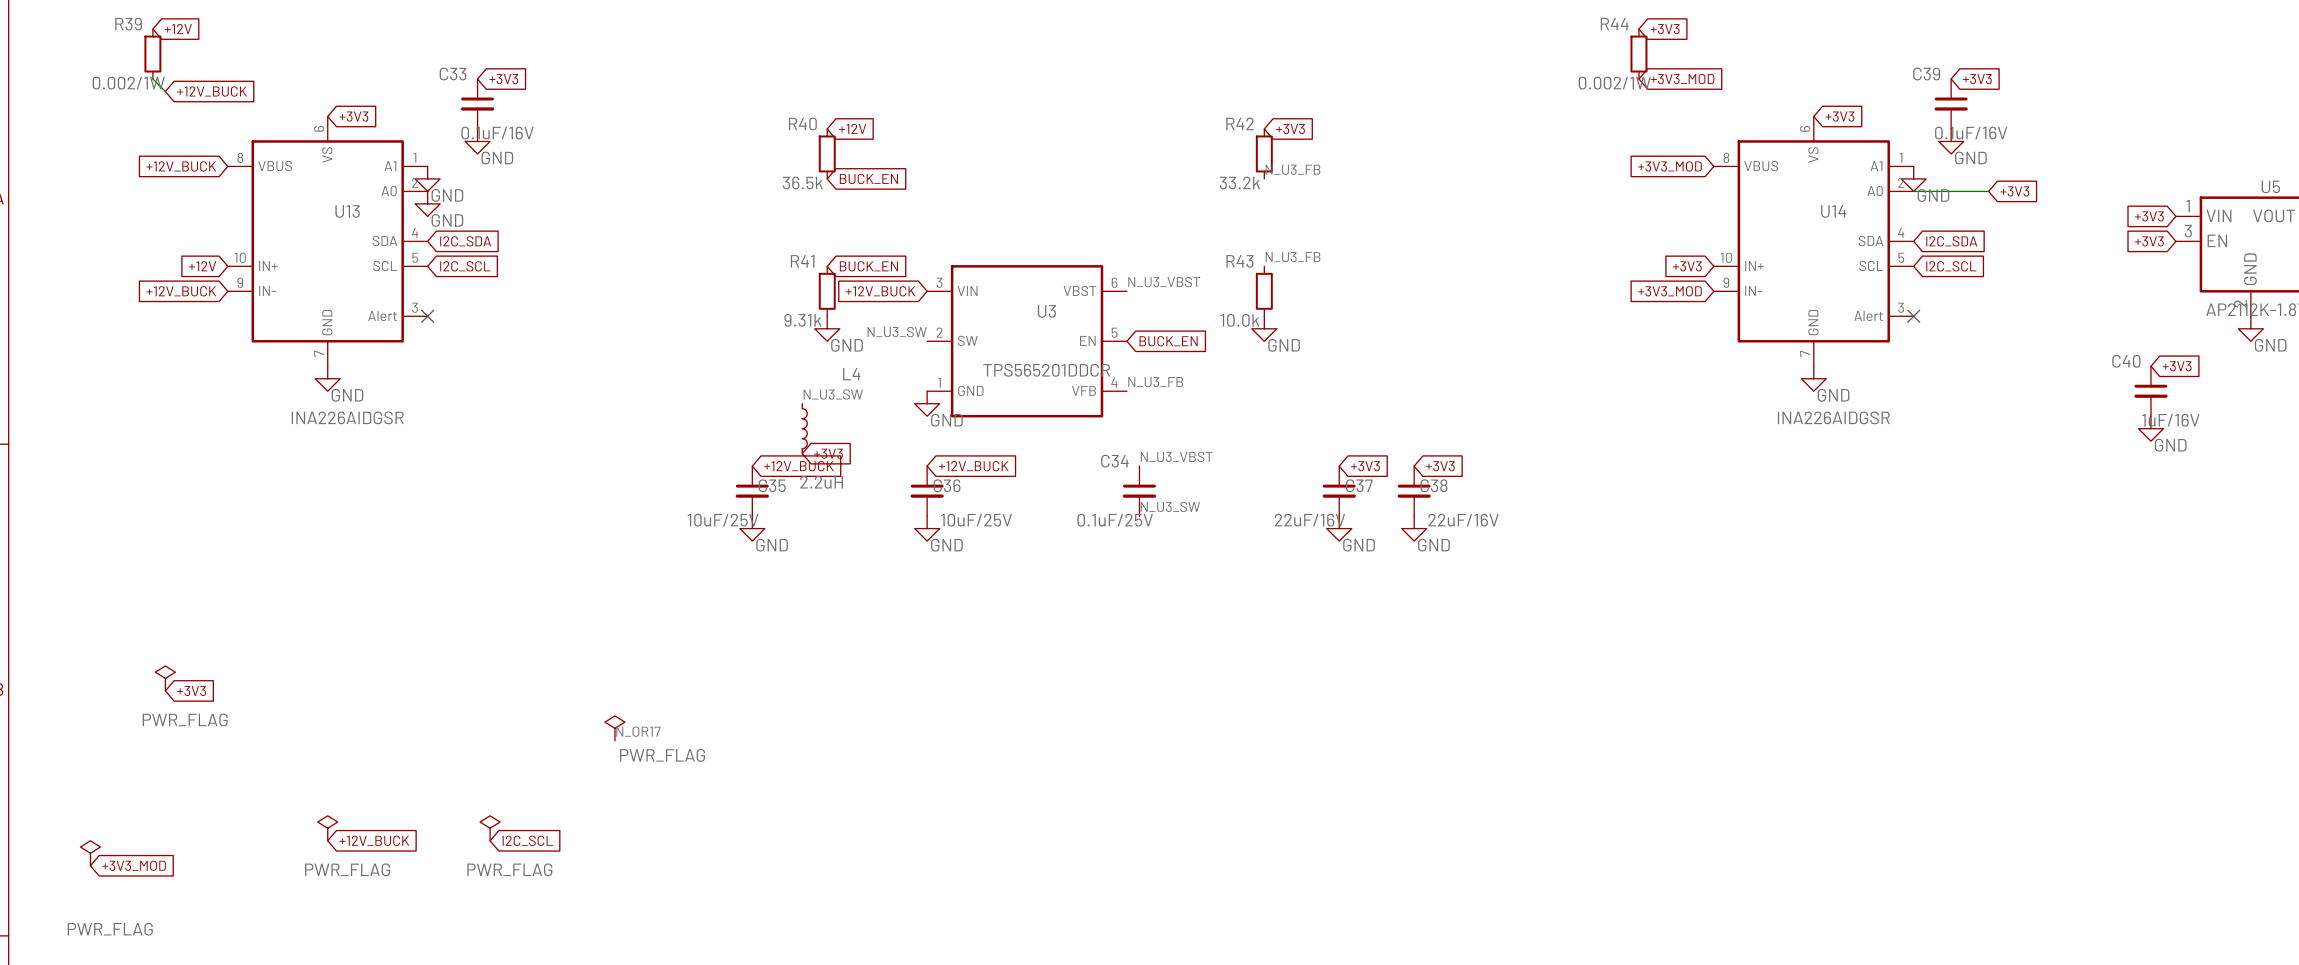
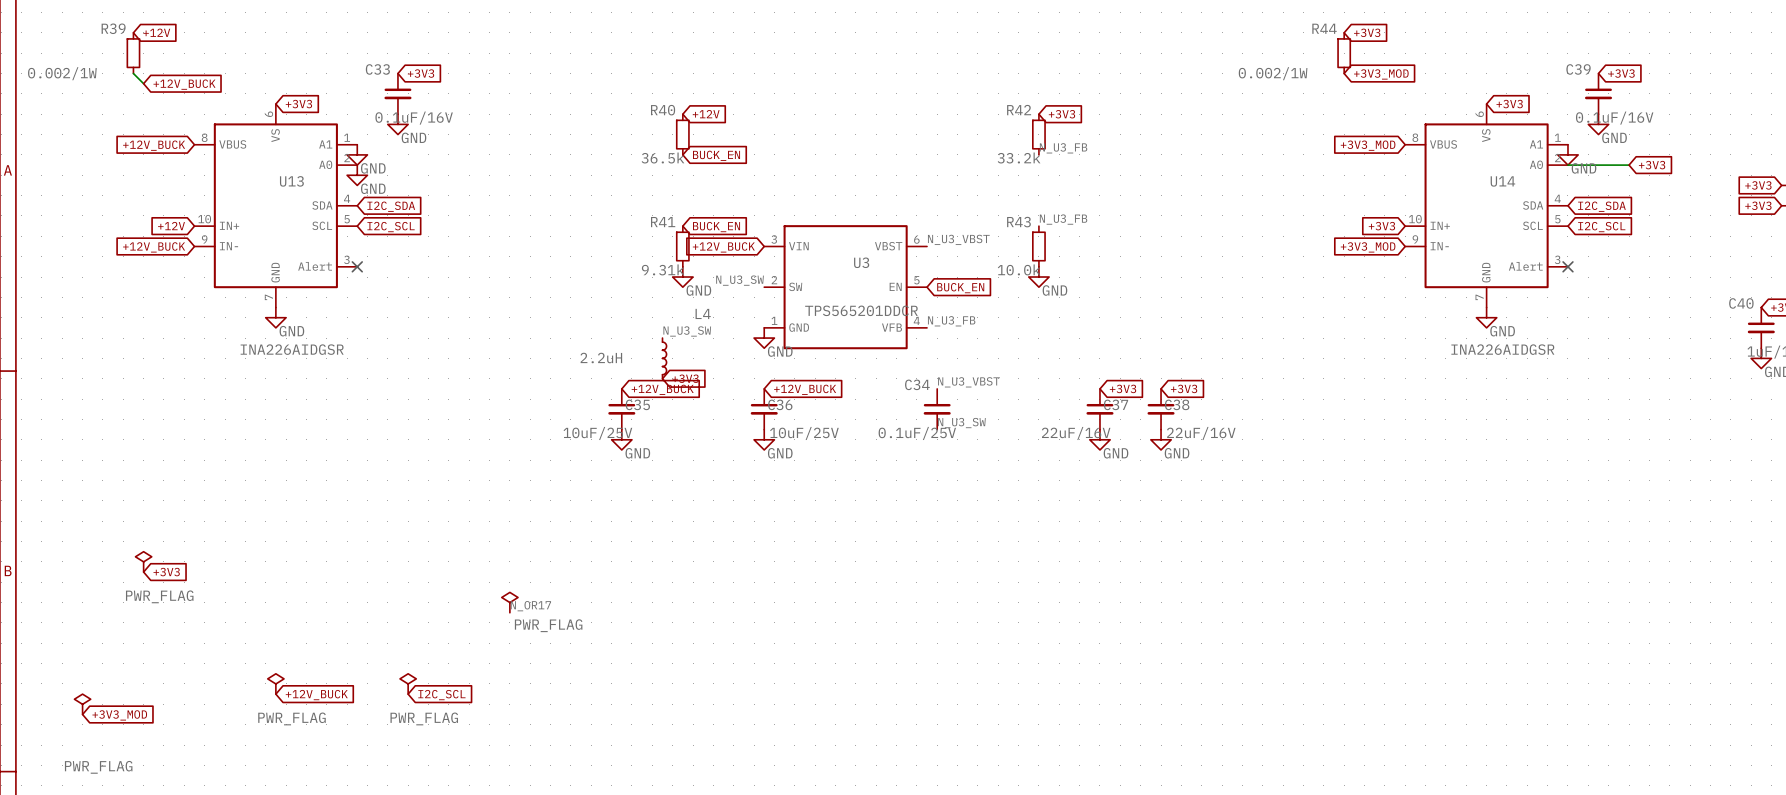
R39 value position: 0.002/1W (128, 83) -> 0.002/1W (62, 73)
R44 value position: 0.002/1W (1614, 83) -> 0.002/1W (1273, 73)
L4 value position: 2.2uH (821, 482) -> 2.2uH (601, 358)

